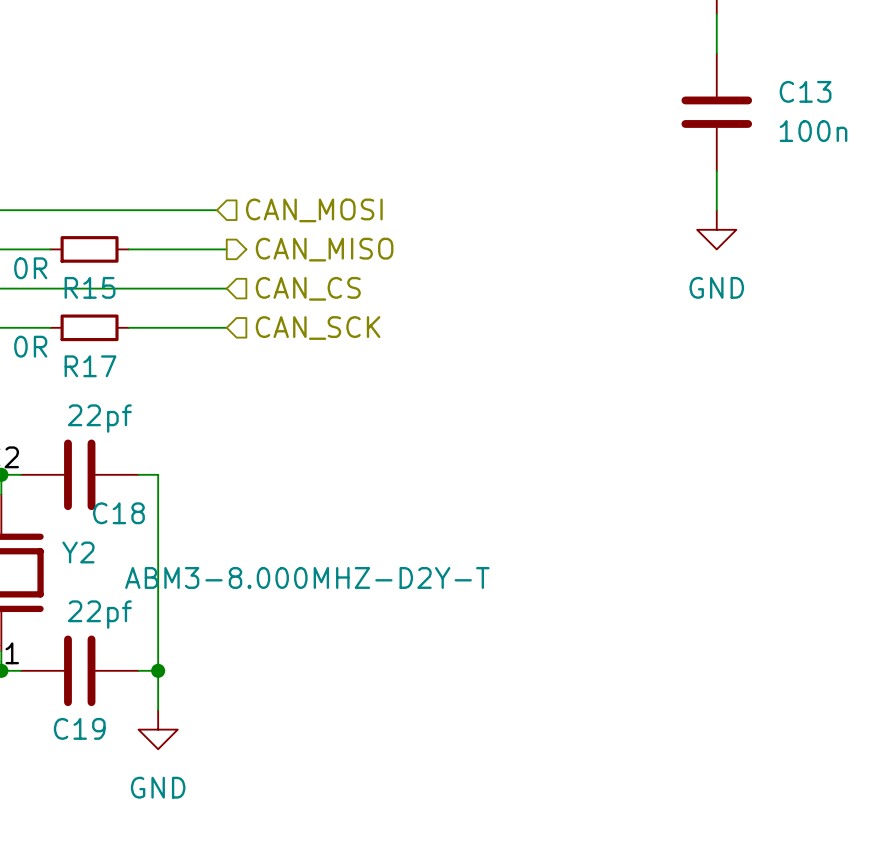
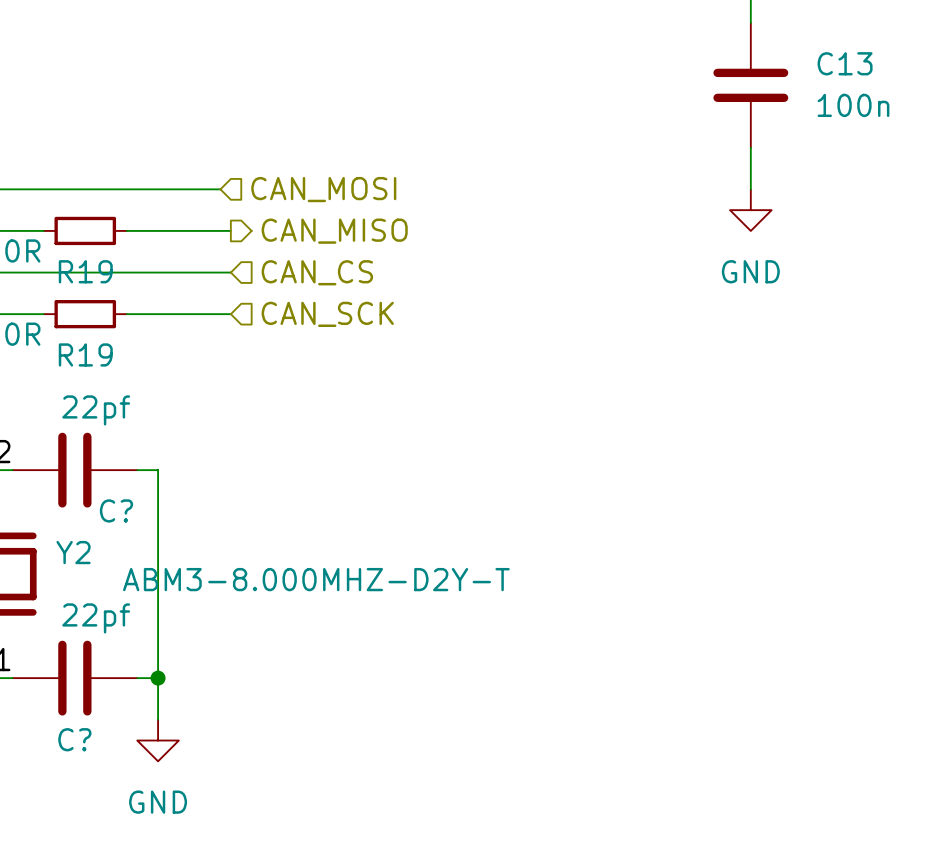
R15 name: R15 (90, 287) -> R19 (85, 271)
R17 name: R17 (90, 366) -> R19 (85, 354)
C18 name: C18 (118, 513) -> C? (116, 510)
C19 name: C19 (79, 728) -> C? (74, 739)

